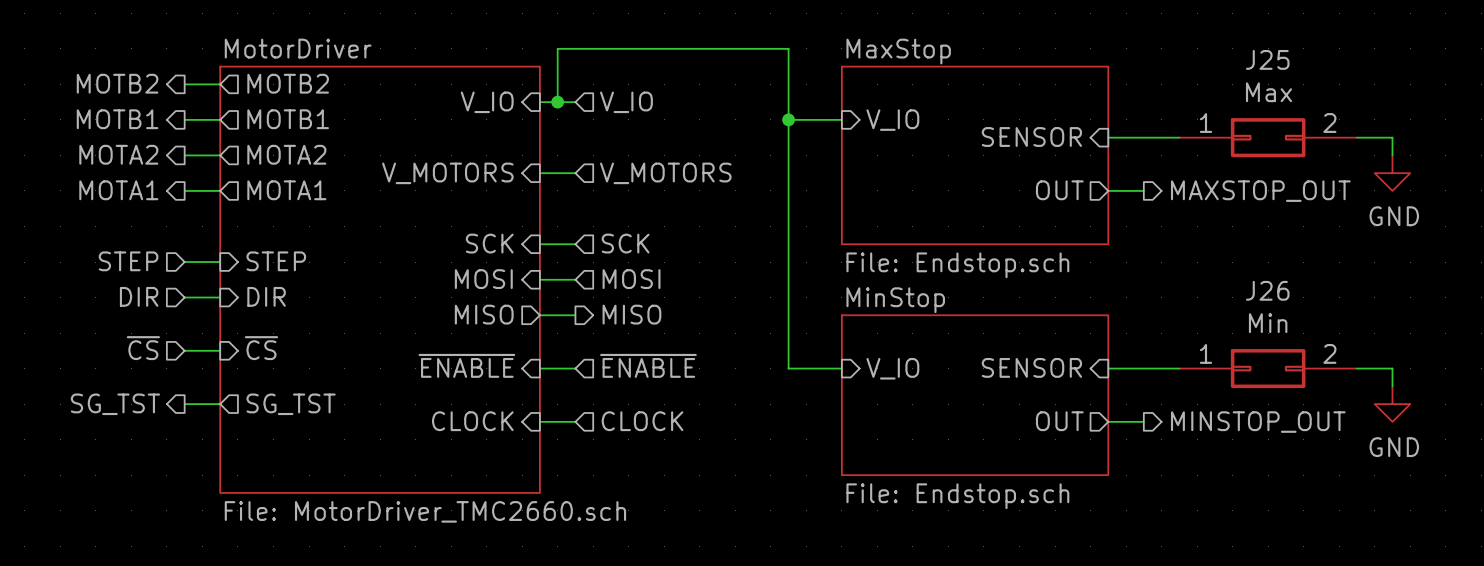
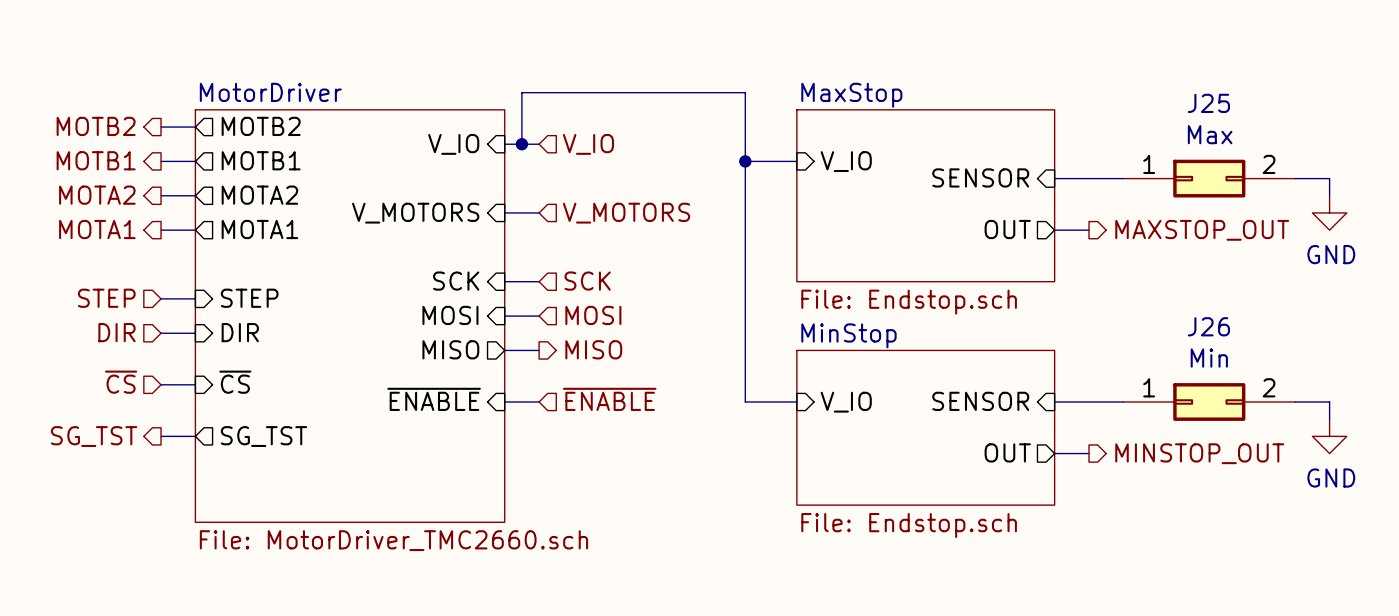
sheet pin: CLOCK (472, 421) -> none
wire: (539, 421) (575, 421) -> none
hierarchical label: CLOCK (642, 421) -> none

